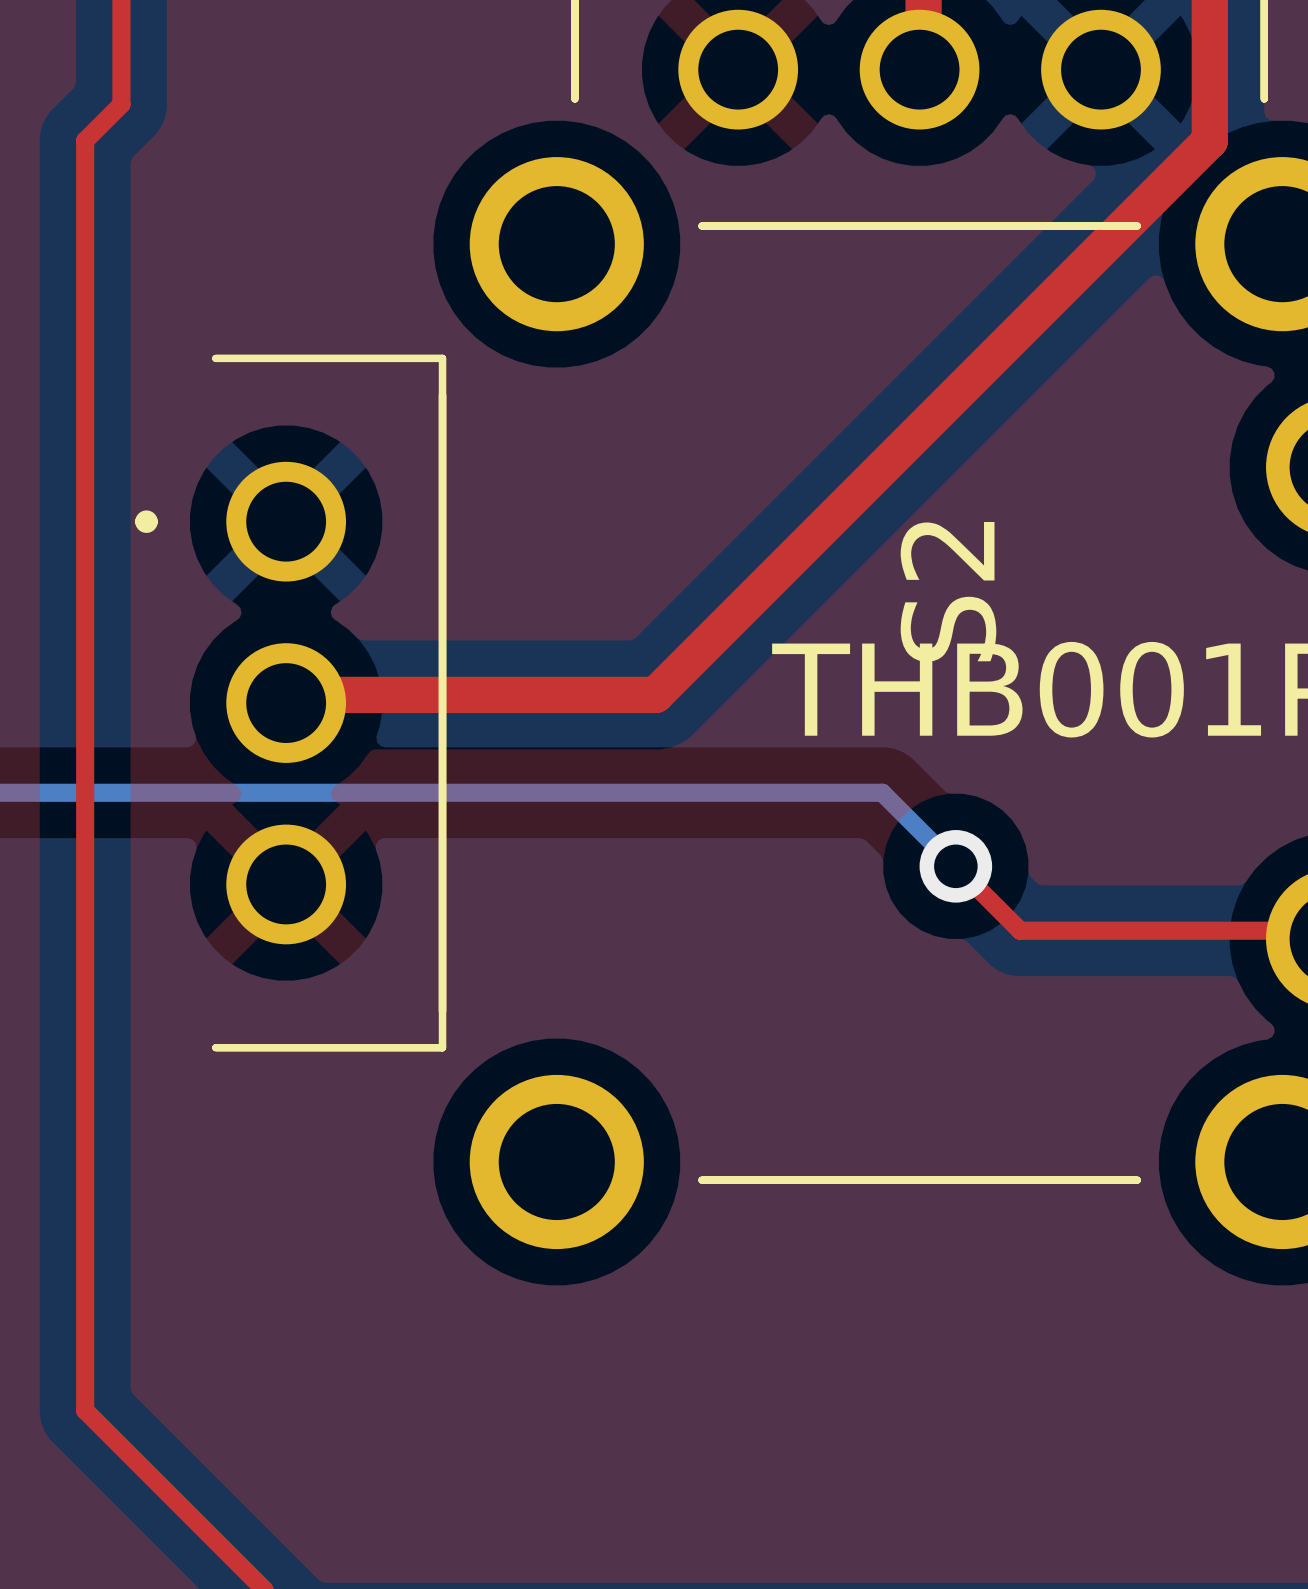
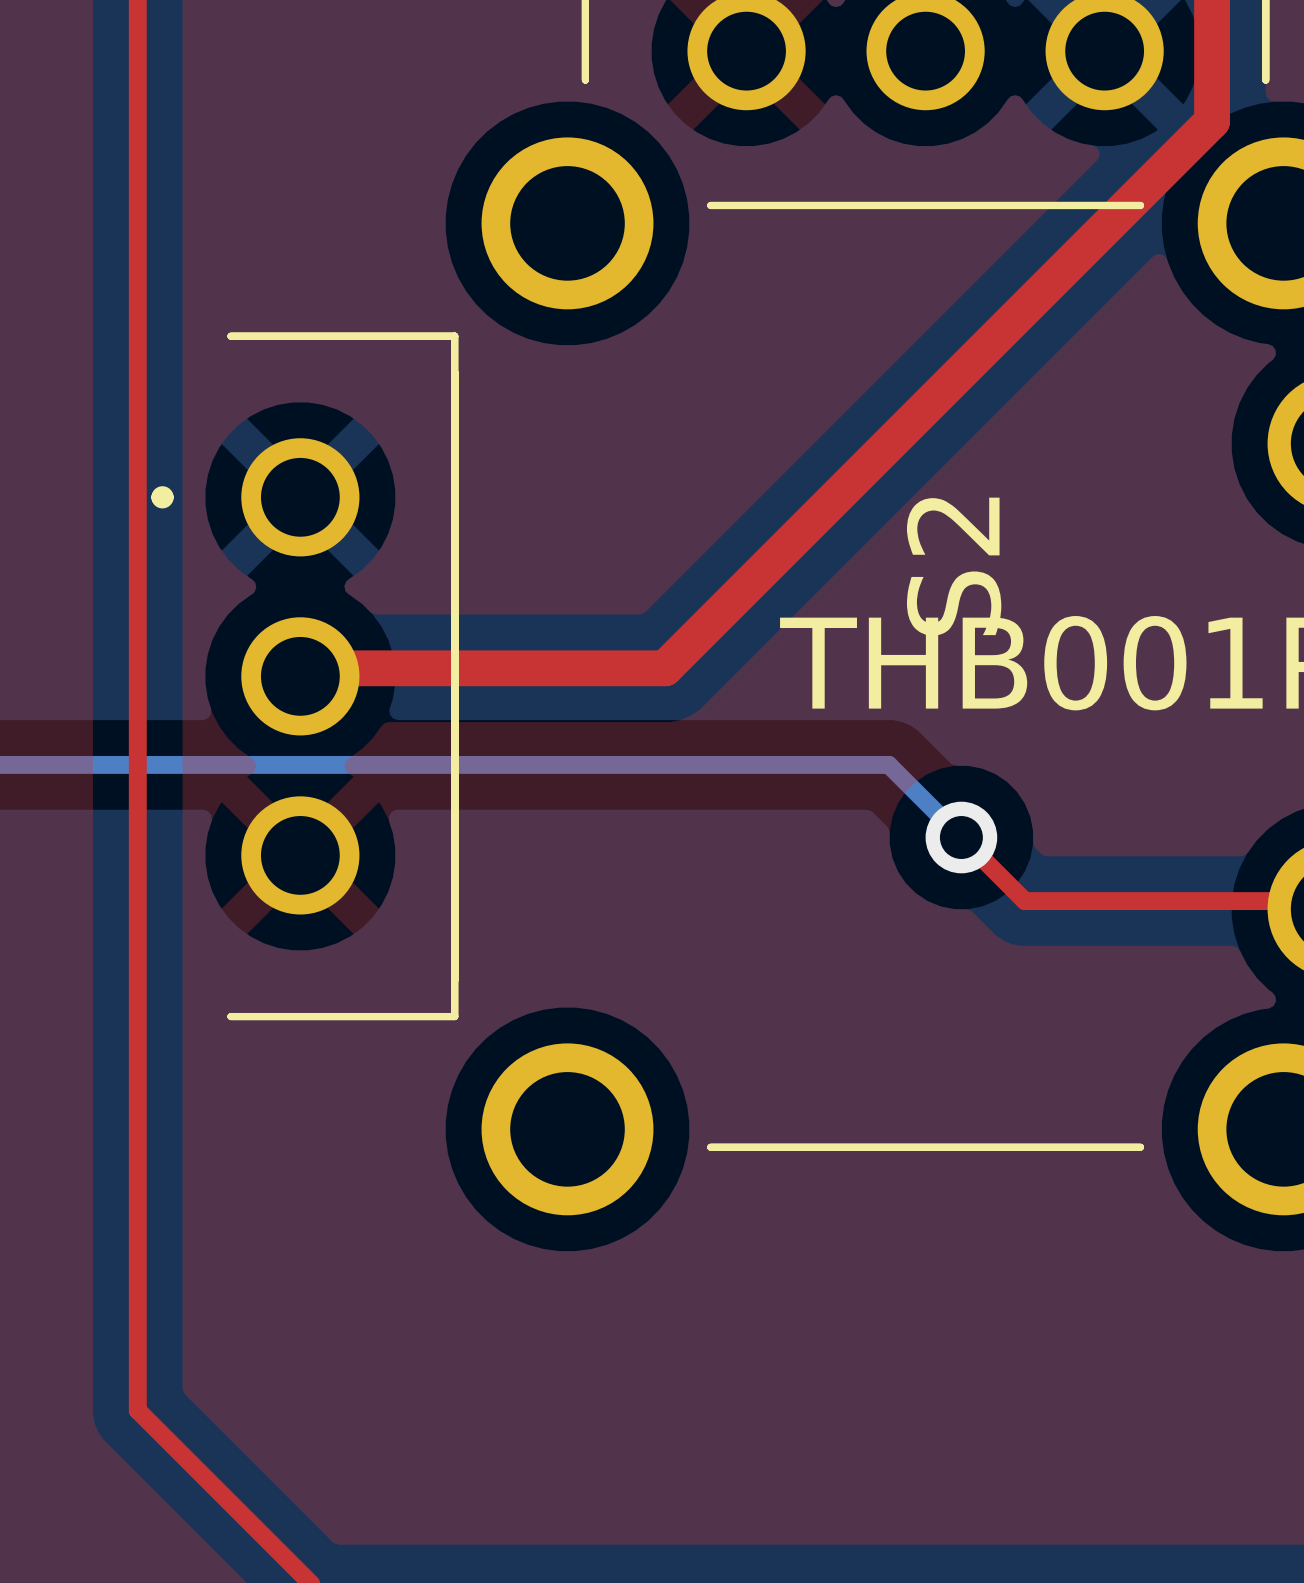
top track: (121, 104) (85, 140) (85, 1410) (121, 1446) -> (137, 85) (137, 1410)

